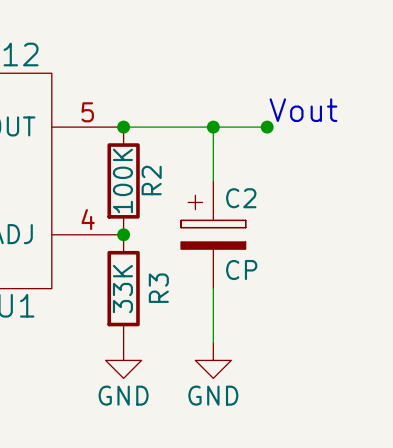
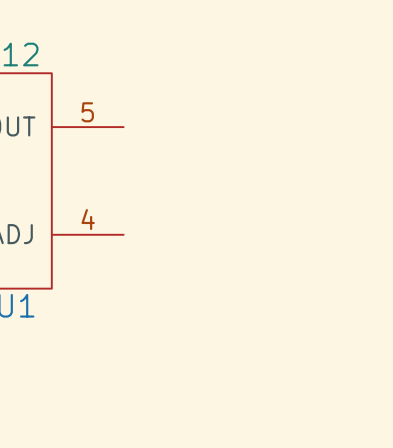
text: Vout (303, 110) -> none
wire: (123, 127) (267, 127) -> none
junction: (123, 127) -> none
wire: (213, 127) (213, 180) -> none
junction: (213, 127) -> none
junction: (267, 127) -> none
R2: 100K (123, 180) -> none
junction: (123, 234) -> none
C2: CP (213, 234) -> none
R3: 33K (123, 288) -> none
wire: (213, 288) (213, 342) -> none
power symbol: GND (123, 360) -> none
power symbol: GND (213, 360) -> none

